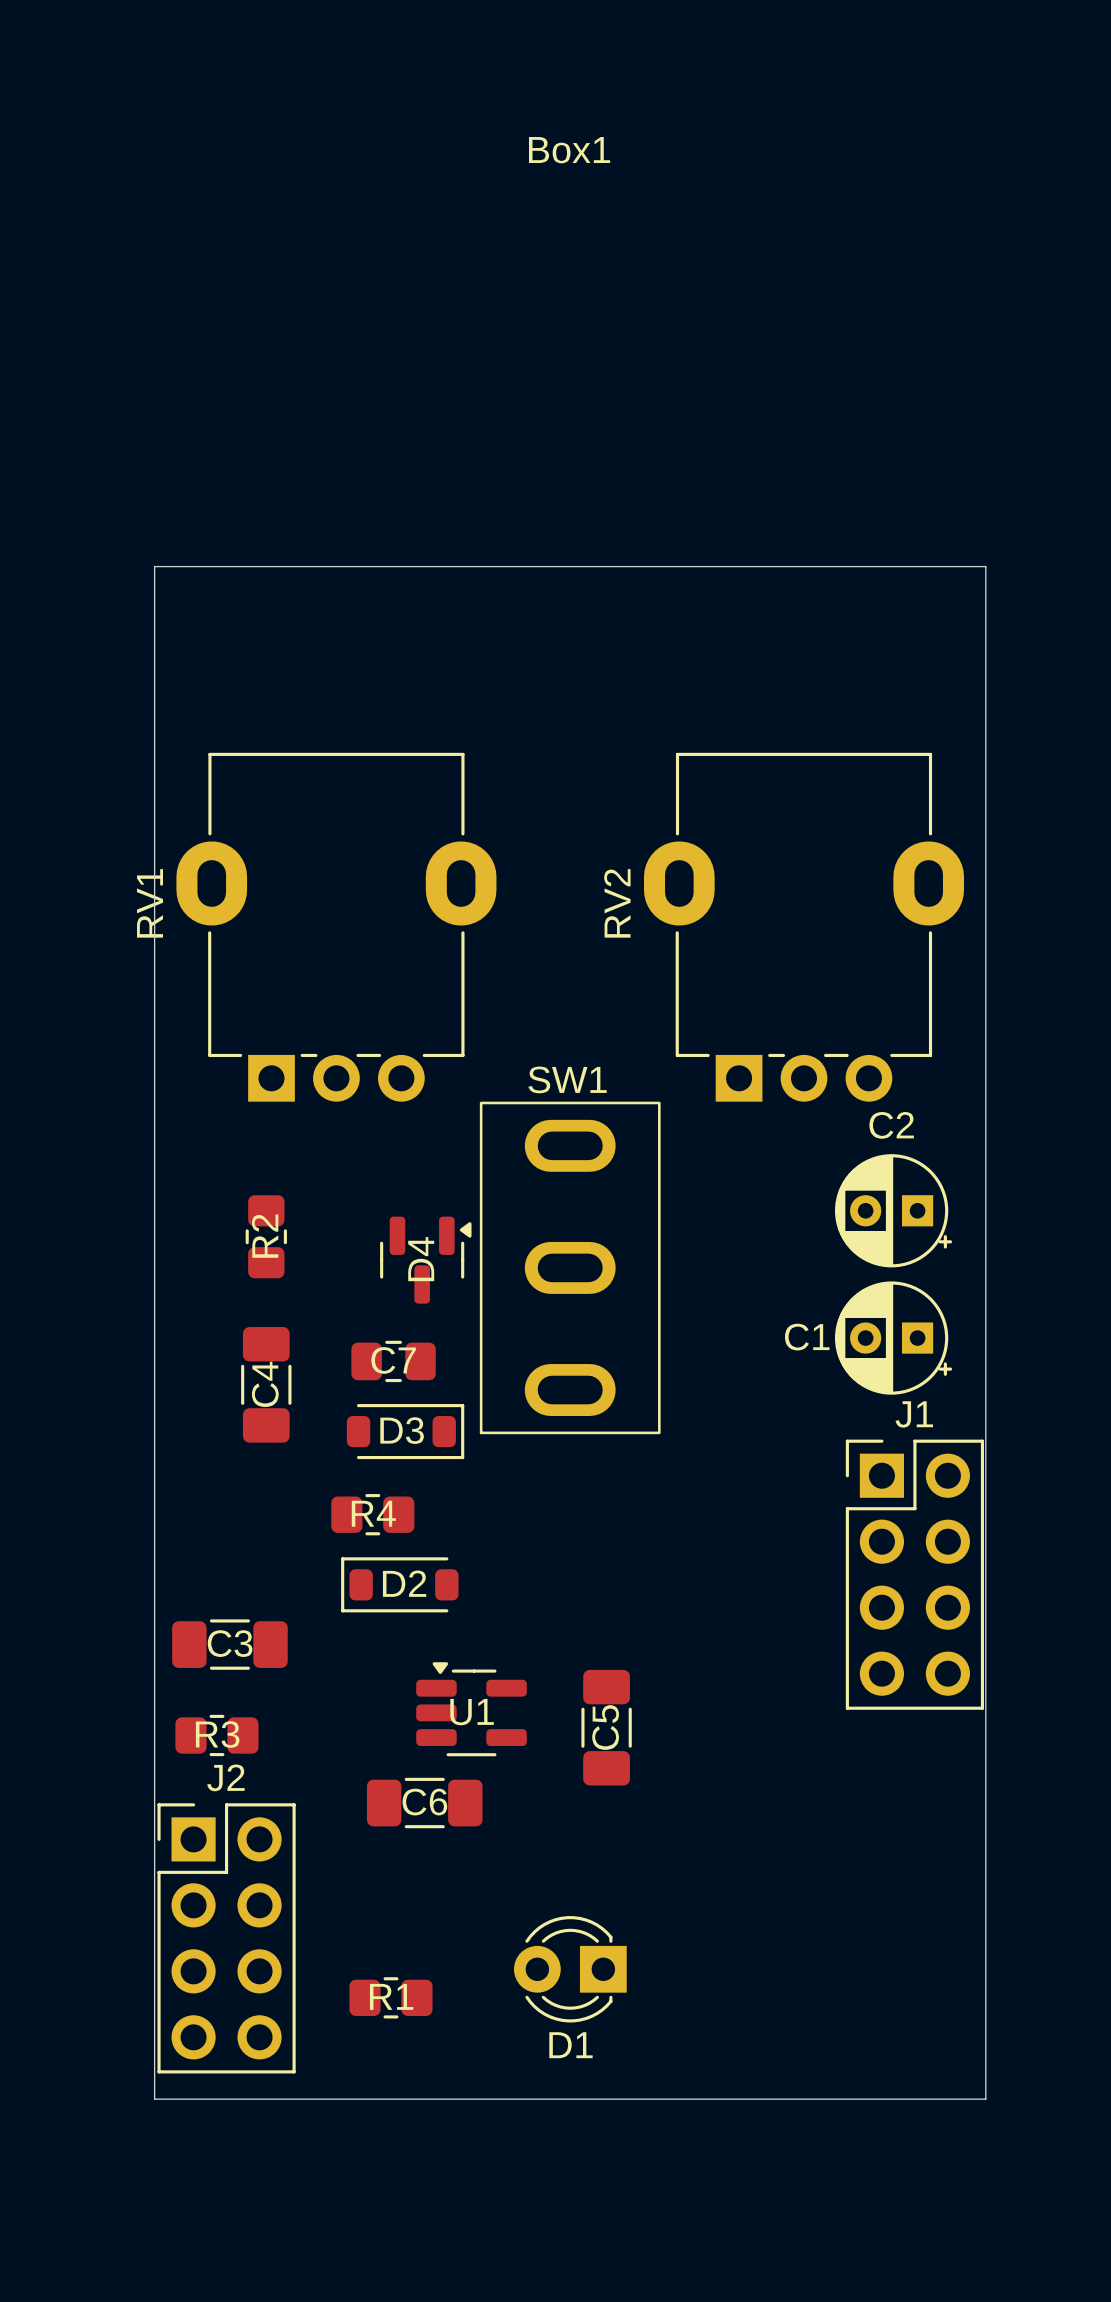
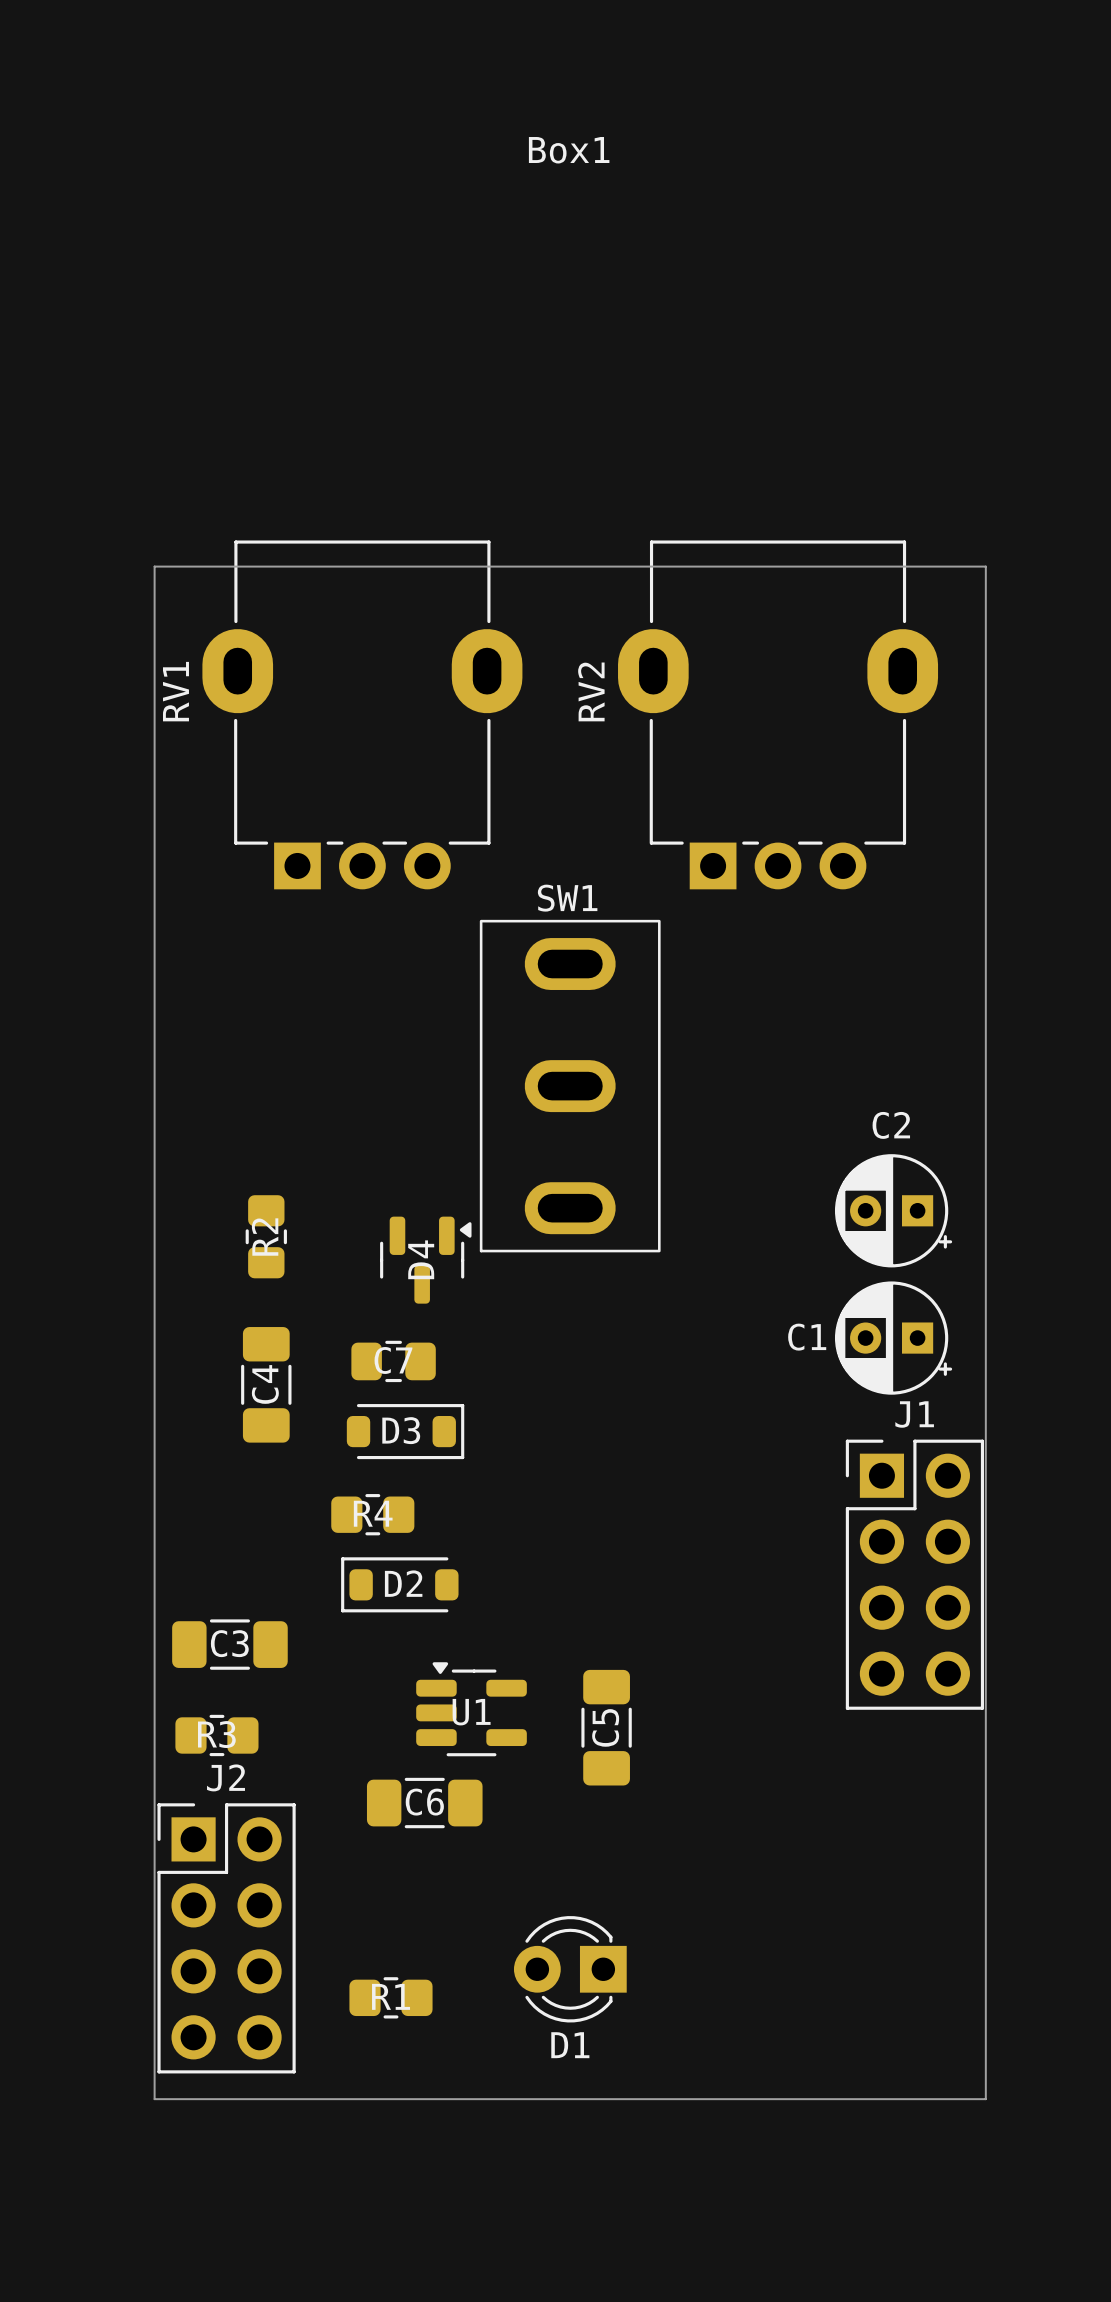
RV1 position: (336, 927) -> (362, 714)
RV2 position: (804, 927) -> (778, 714)
SW1 position: (570, 1267) -> (570, 1086)

